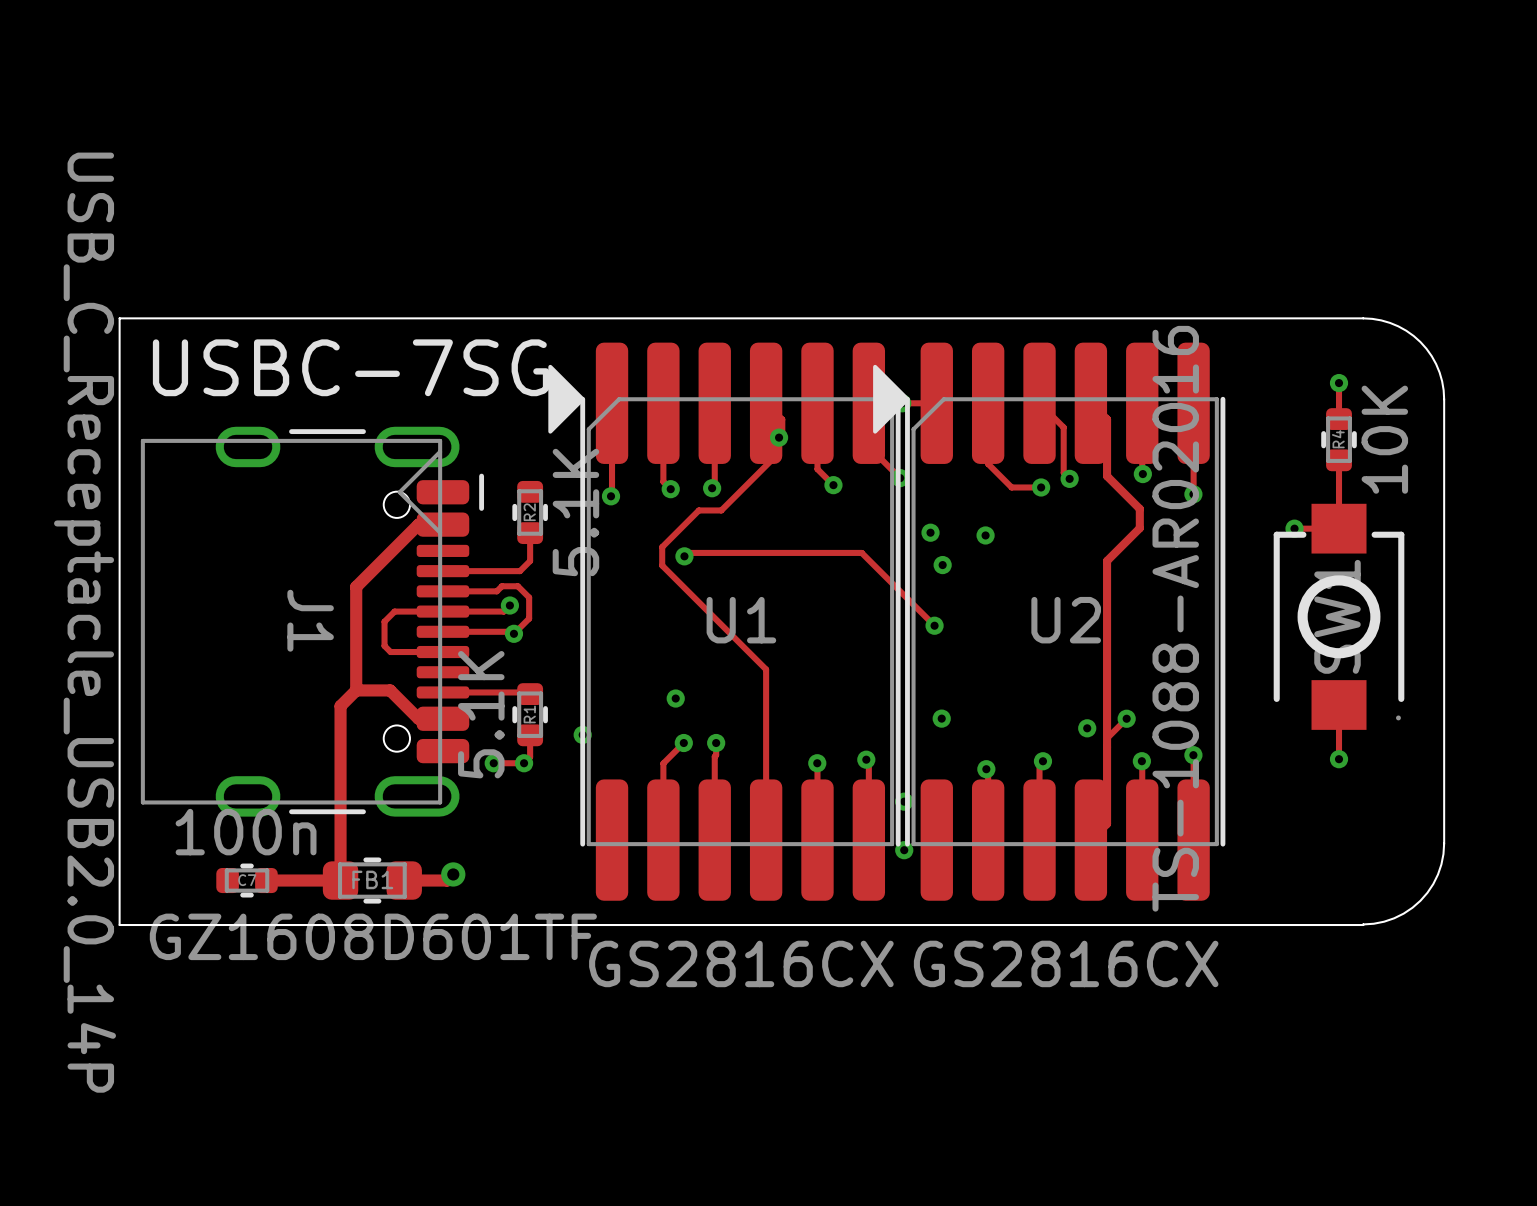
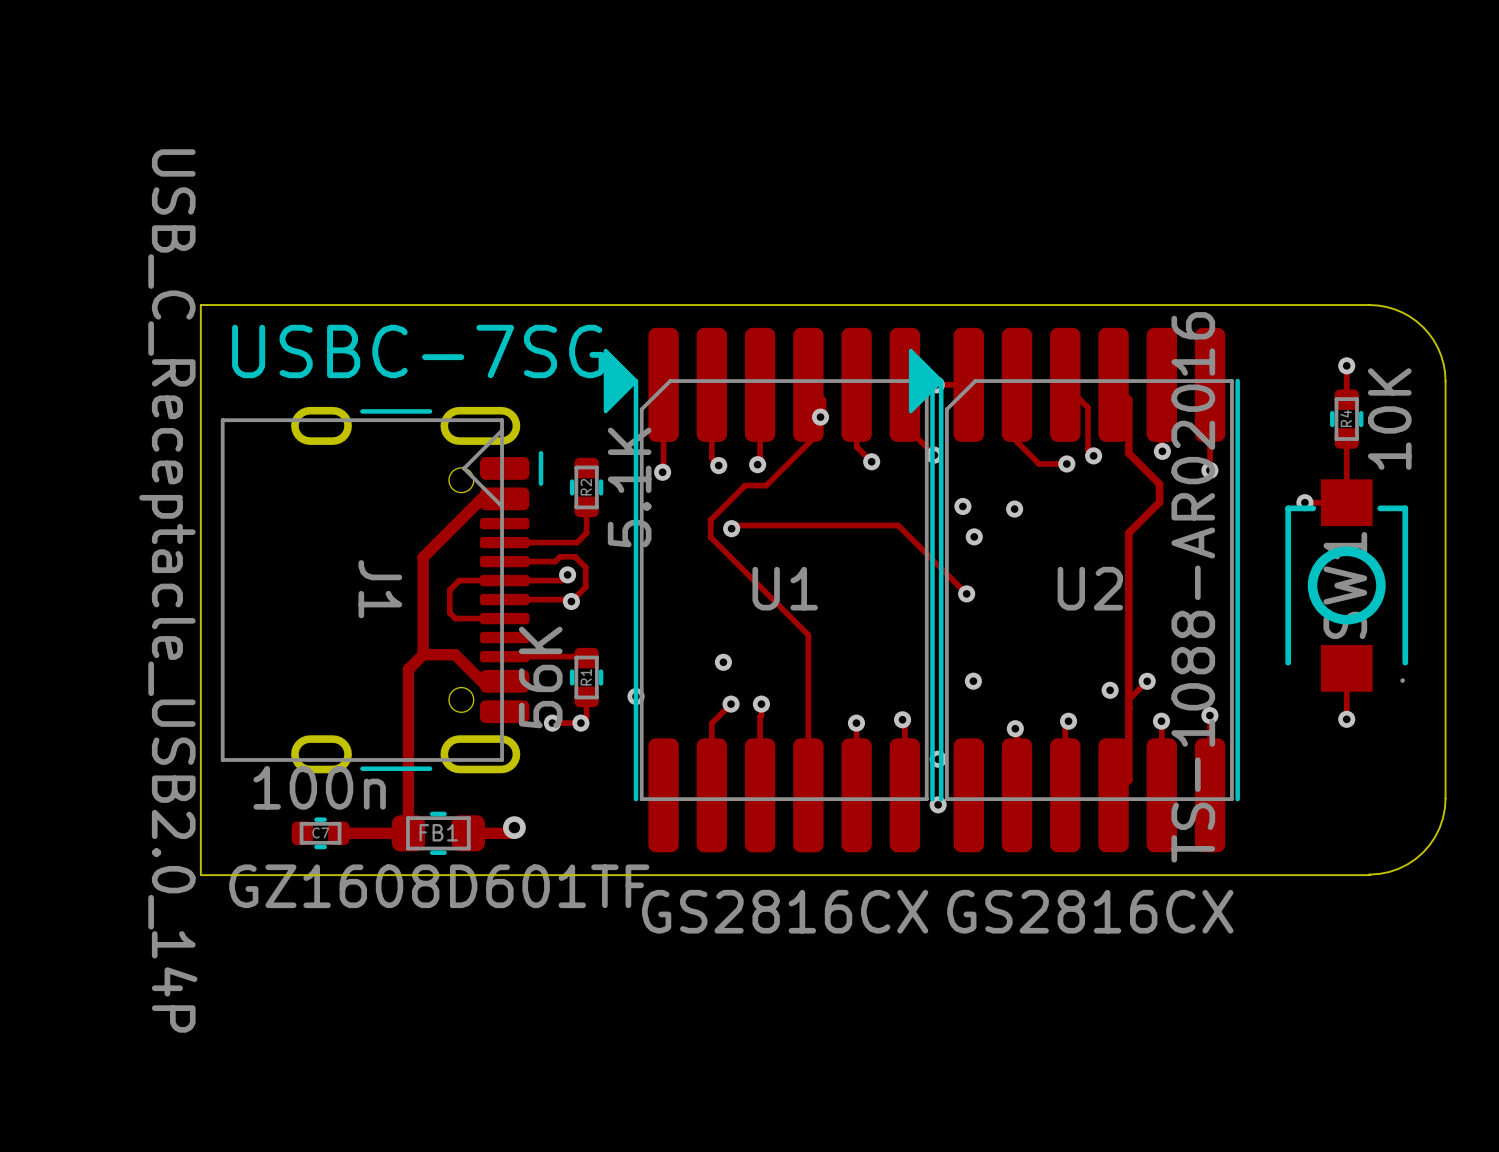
R1 value: 5.1K (481, 714) -> 56K (540, 677)

